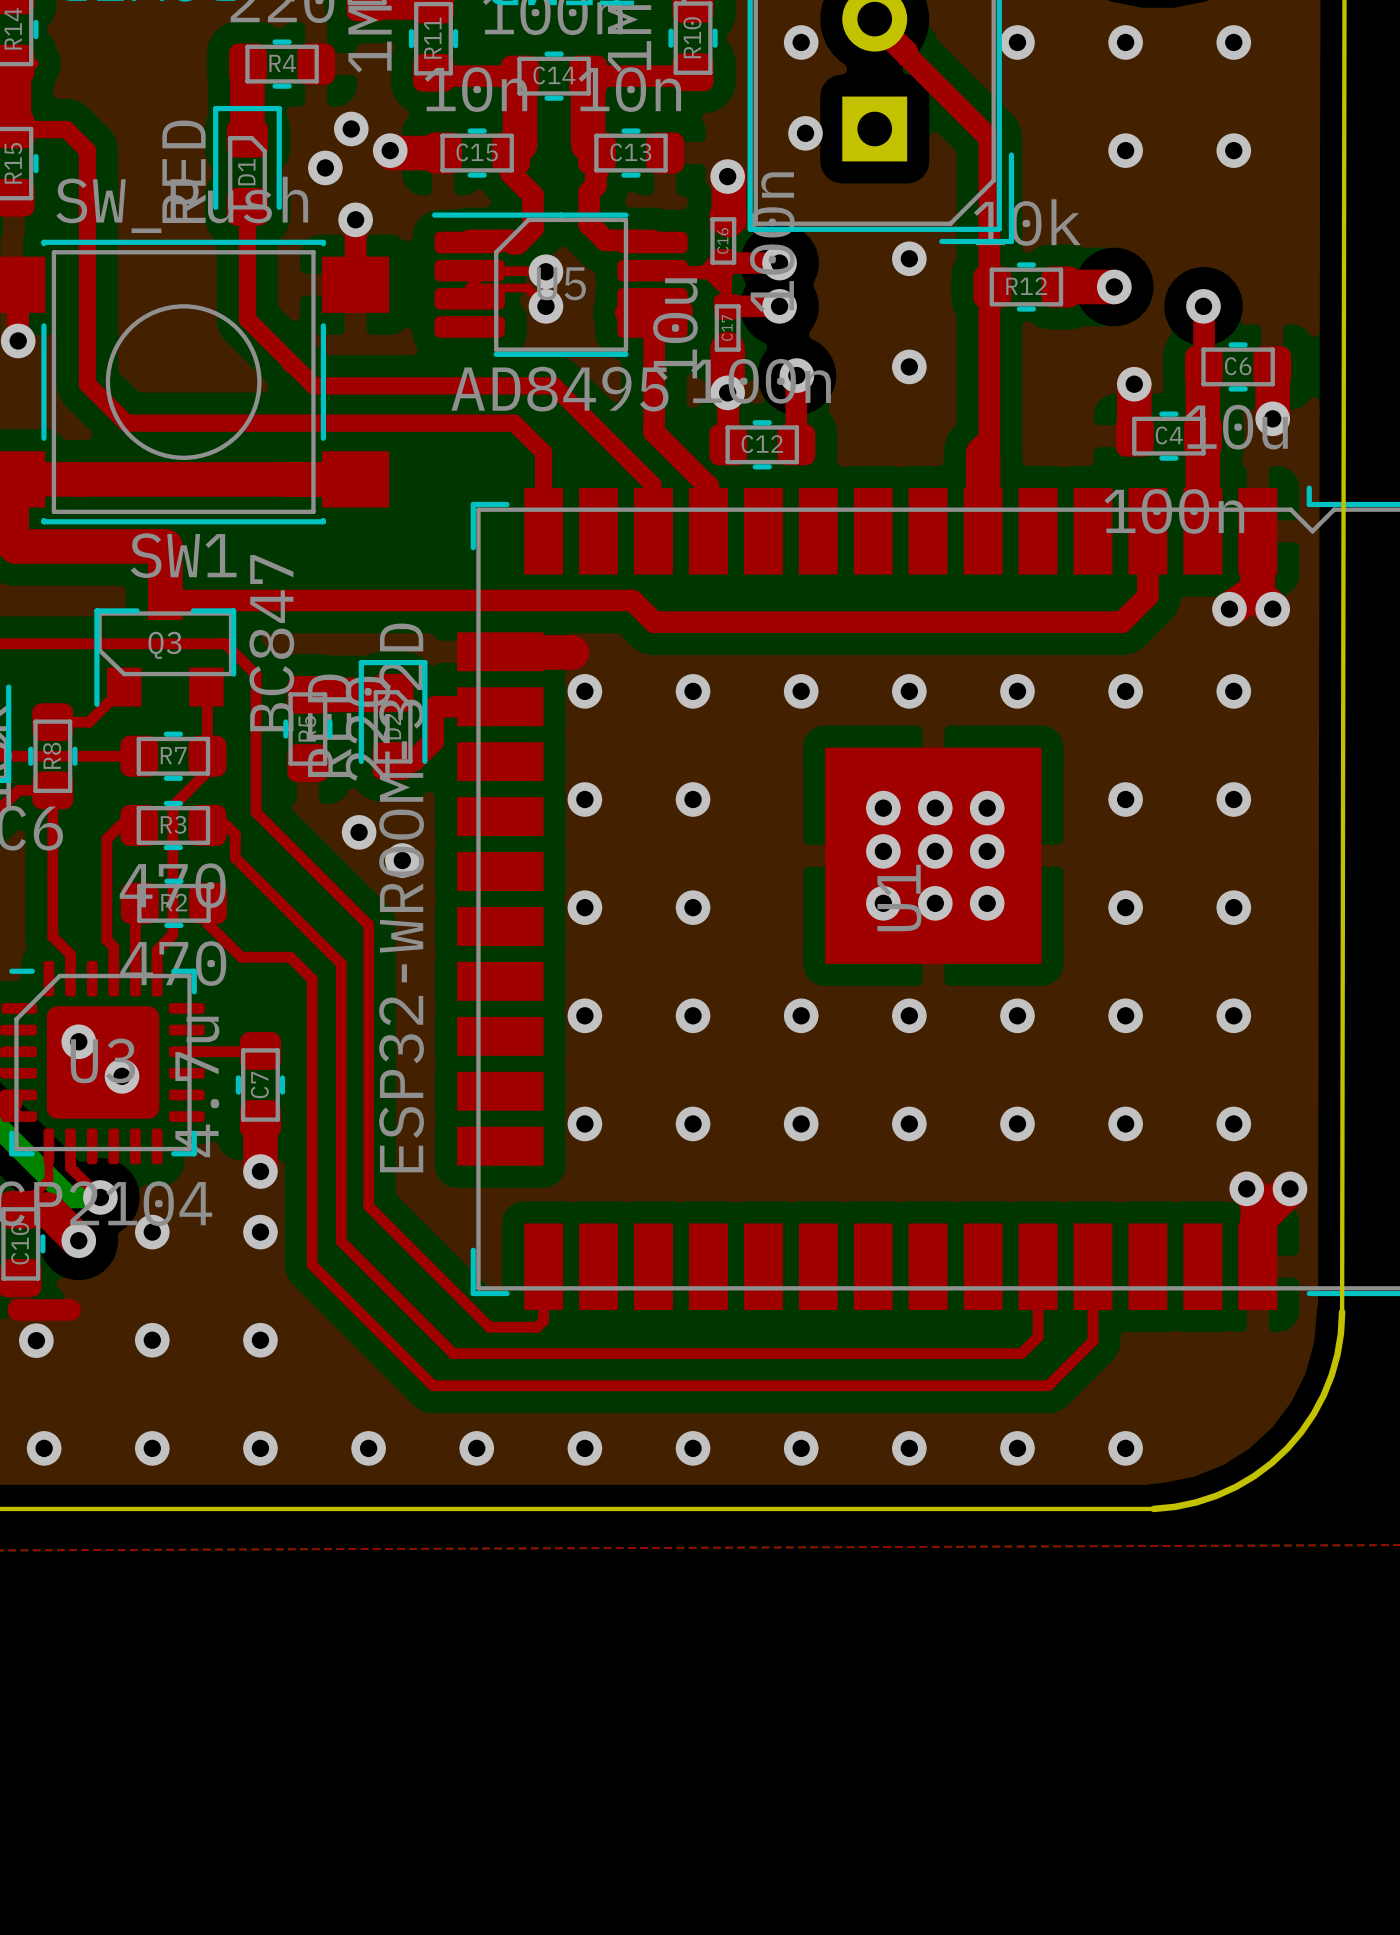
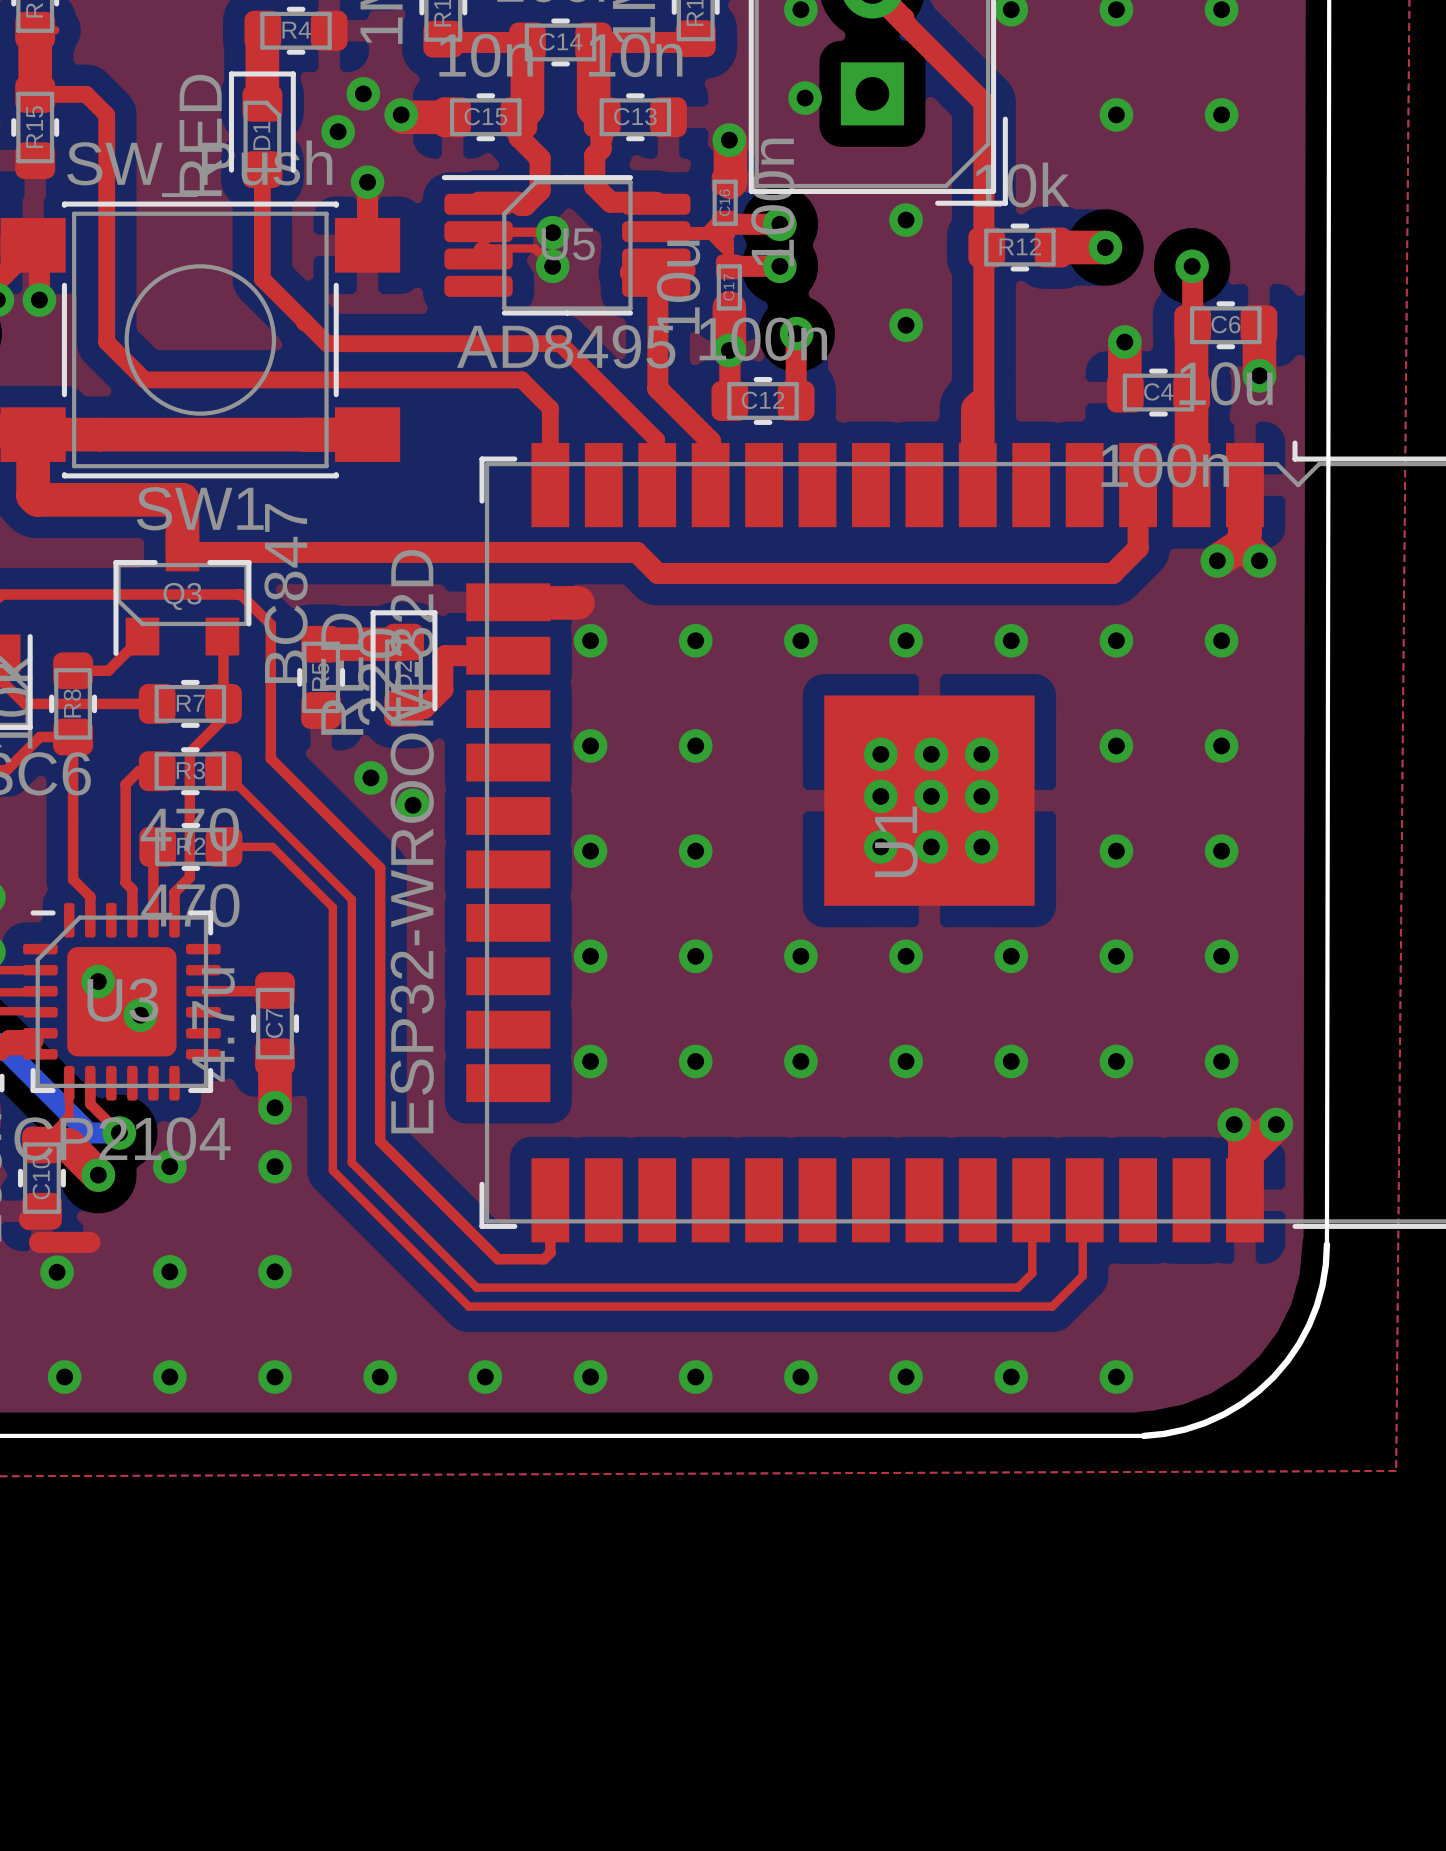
top track: (207, 825) (226, 825) (235, 834) (235, 857) (341, 963) (341, 1241) (453, 1353) (1021, 1353) (1038, 1337) (1038, 1266) -> (223, 771) (351, 899) (351, 1162) (476, 1287) (1018, 1287) (1032, 1273) (1032, 1238)
top track: (208, 903) (208, 923) (241, 957) (290, 957) (312, 979) (312, 1264) (433, 1385) (1048, 1385) (1092, 1341) (1092, 1266) -> (224, 846) (272, 846) (332, 907) (332, 1170) (468, 1306) (1052, 1306) (1082, 1276) (1082, 1232)

